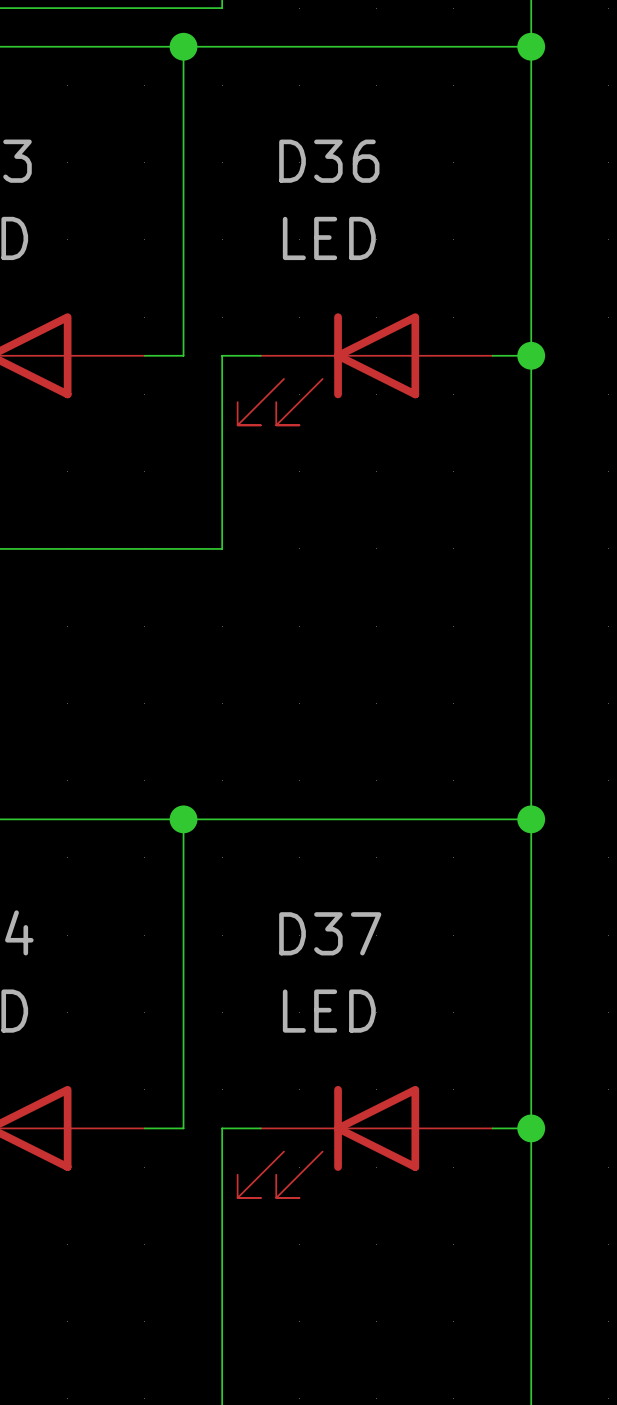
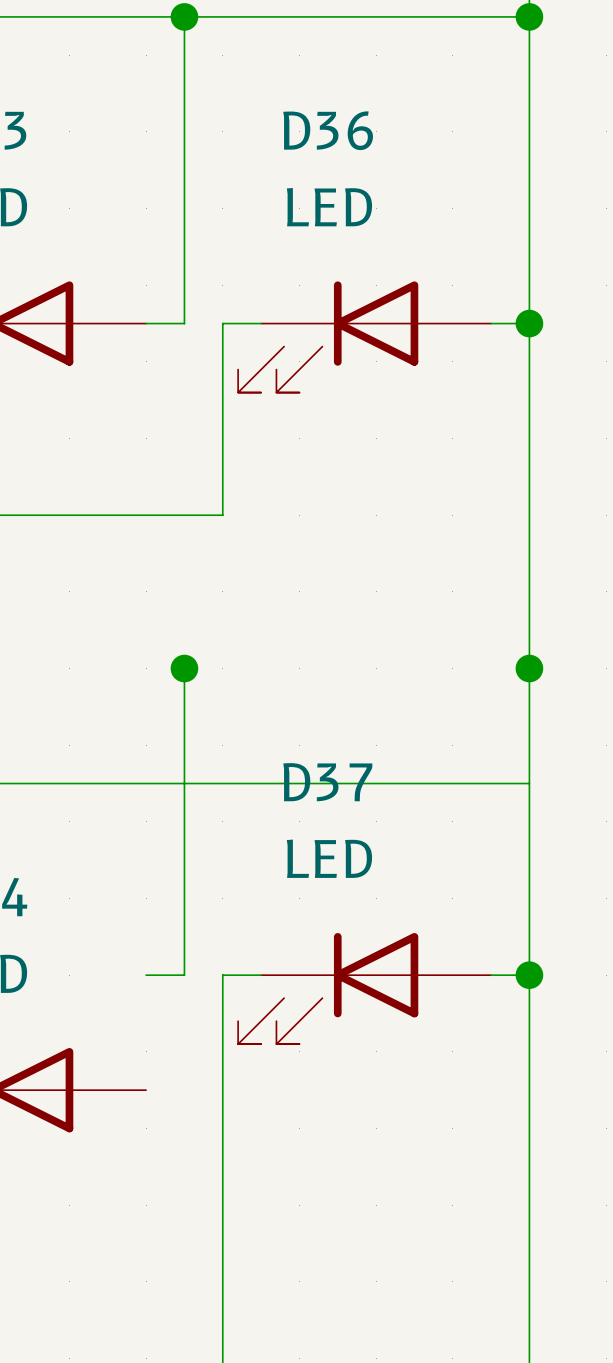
wire: none -> (184, 668) (184, 783)
junction: none -> (529, 668)
junction position: (183, 819) -> (184, 668)
junction: (531, 819) -> none
wire: (183, 1012) (183, 1128) (144, 1128) -> (184, 975) (146, 975)
junction: none -> (529, 975)
wire: (222, 1128) (260, 1128) -> (222, 1090) (222, 975) (261, 975)
wire: (492, 1128) (531, 1128) -> (491, 975) (529, 975)
junction: (531, 1128) -> none
D37 position: (365, 1141) -> (364, 988)

